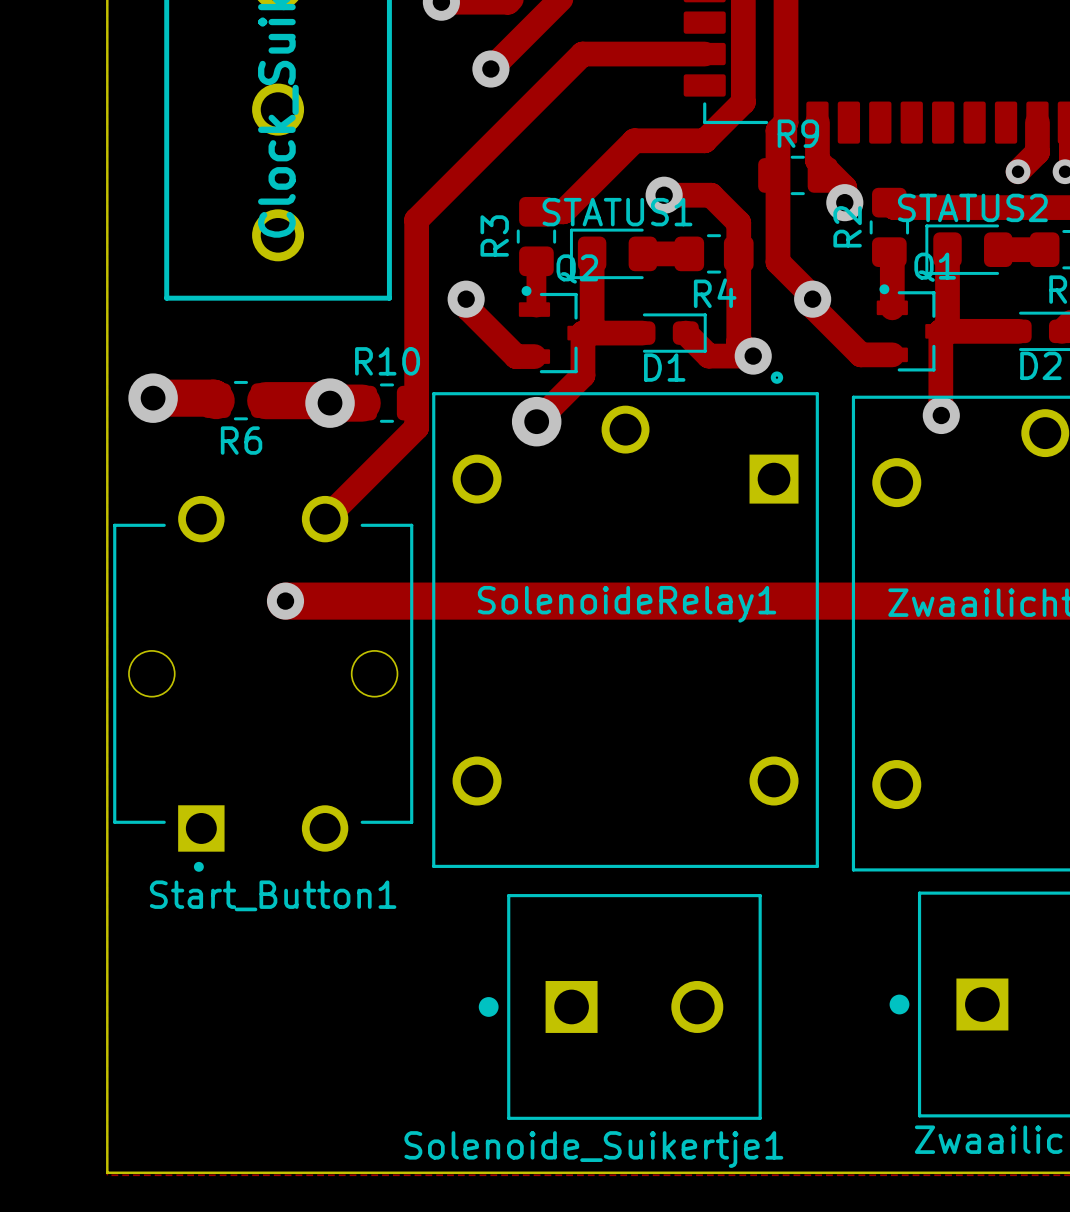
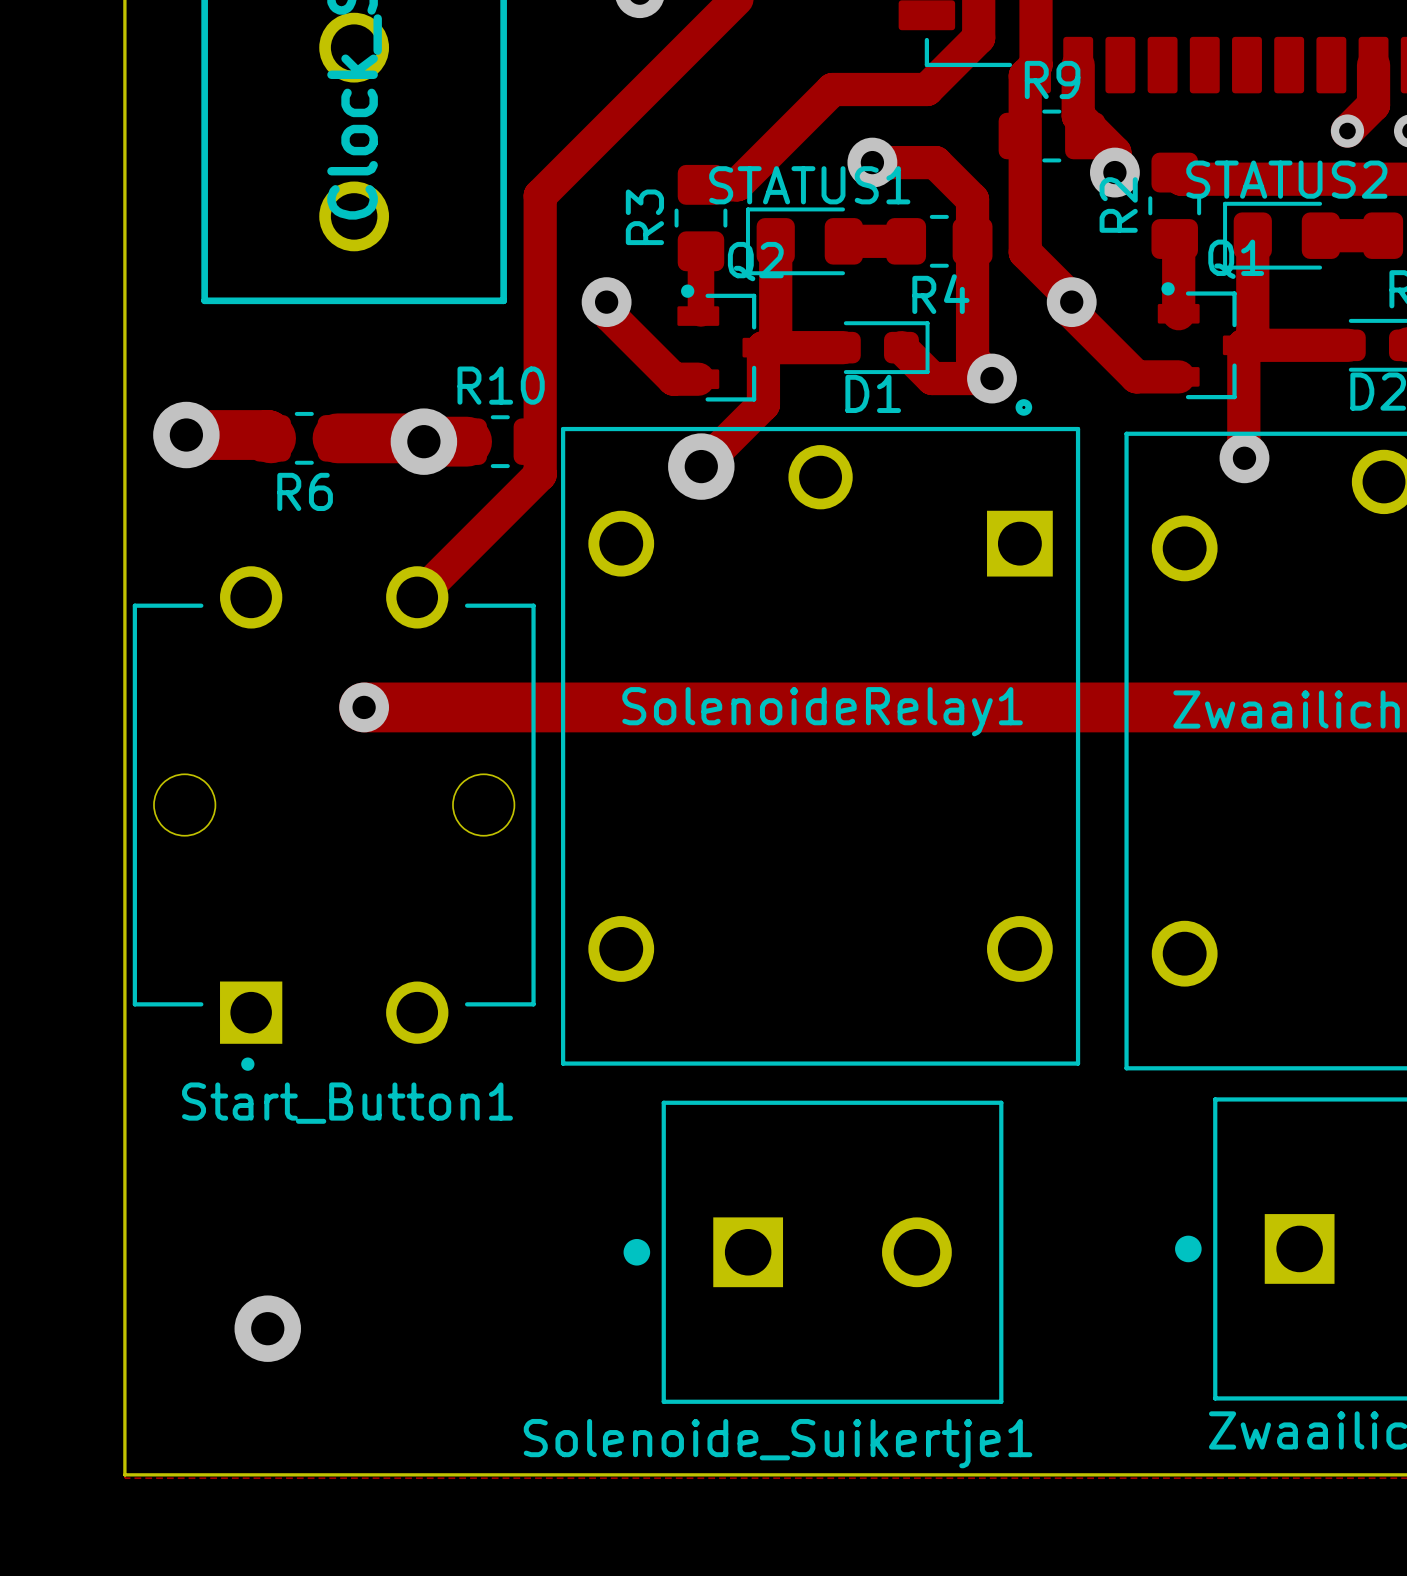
via: none -> (267, 1328)

